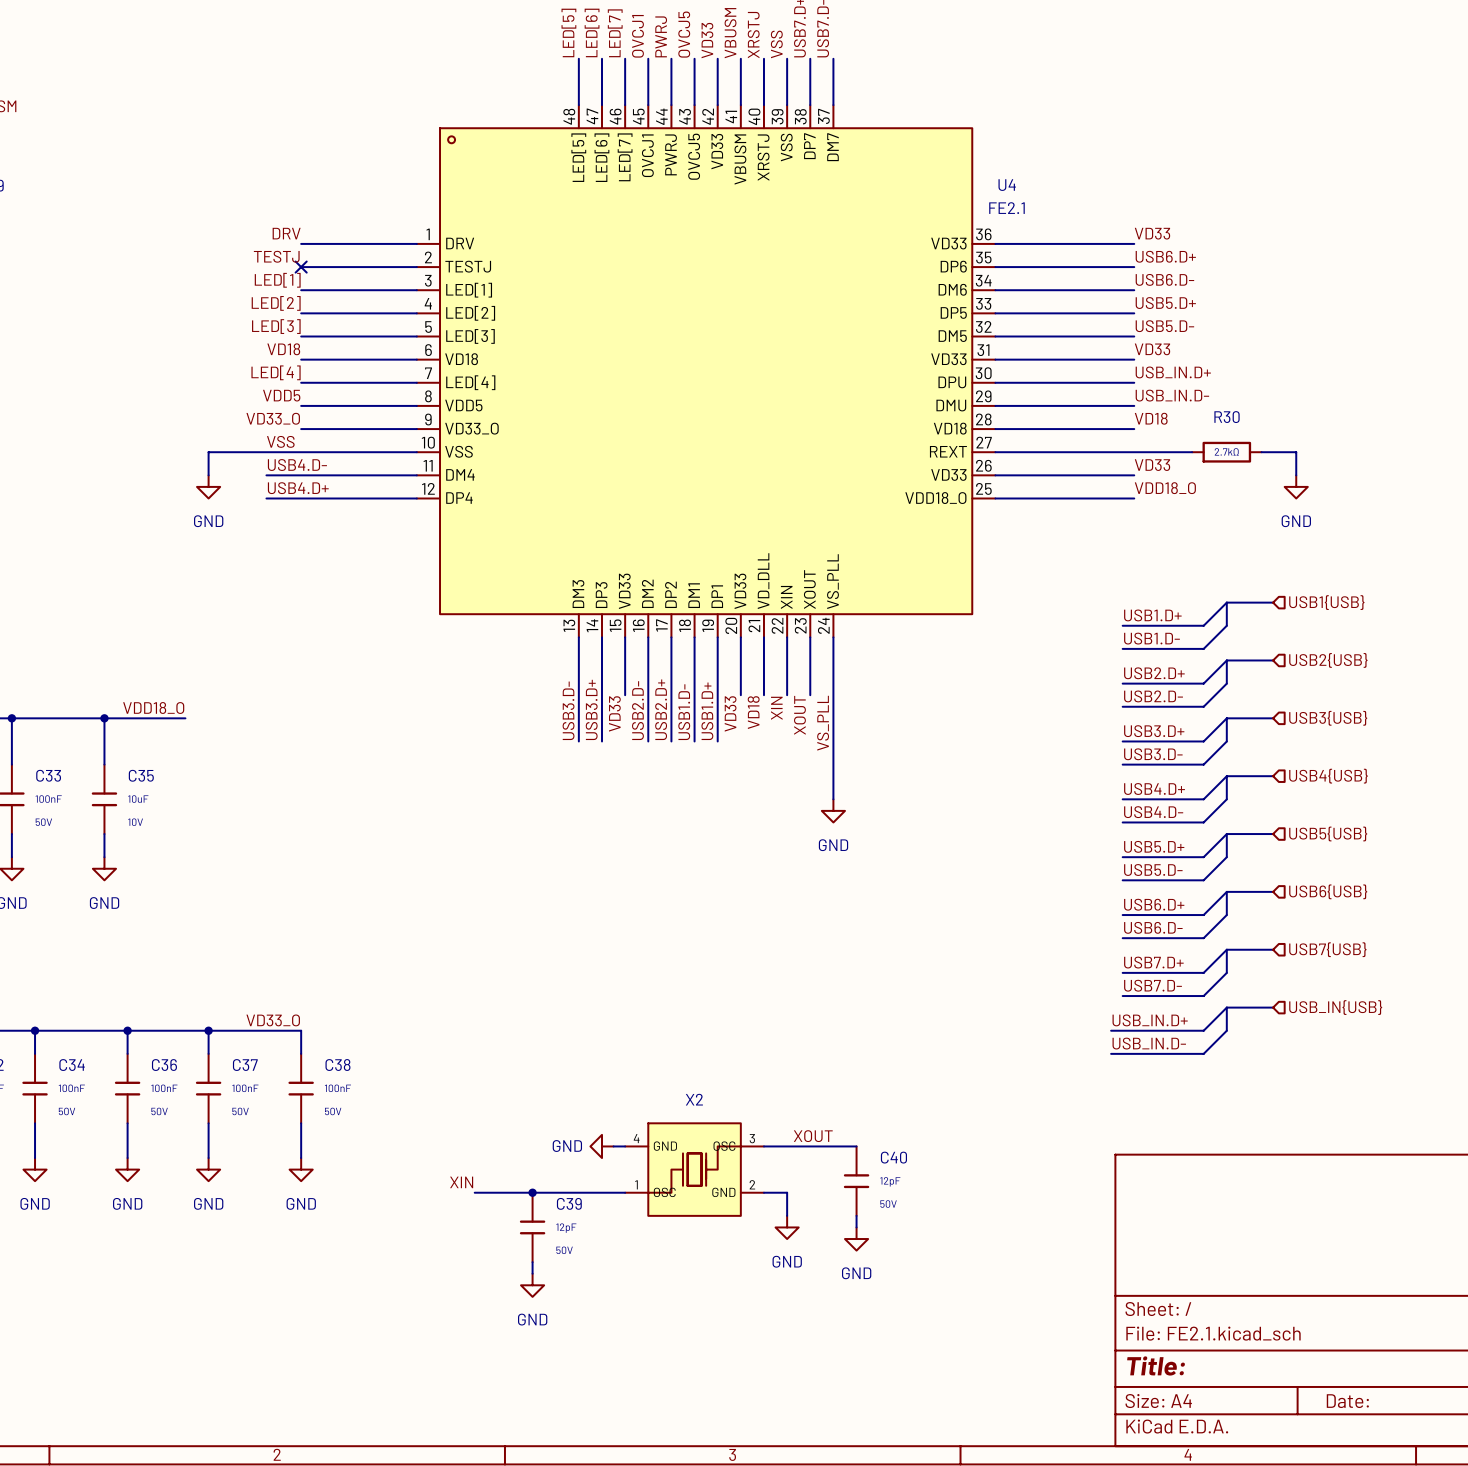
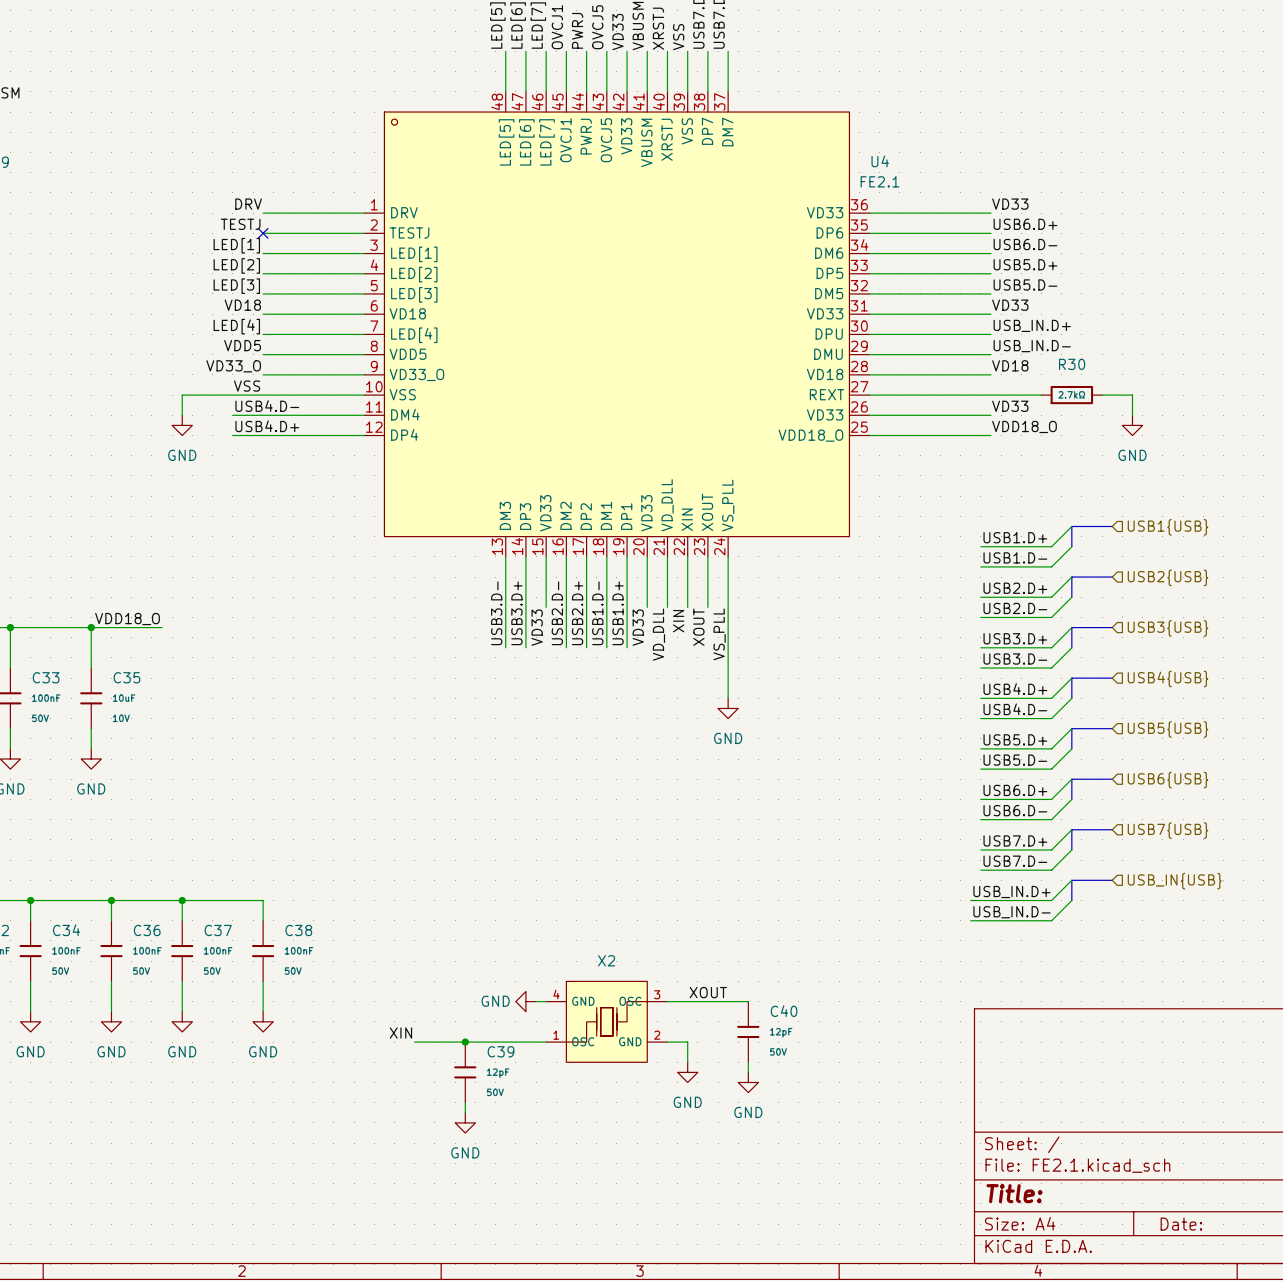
label: VD18 (753, 712) -> VD_DLL (658, 634)
label: VD33_O (273, 1020) -> none

